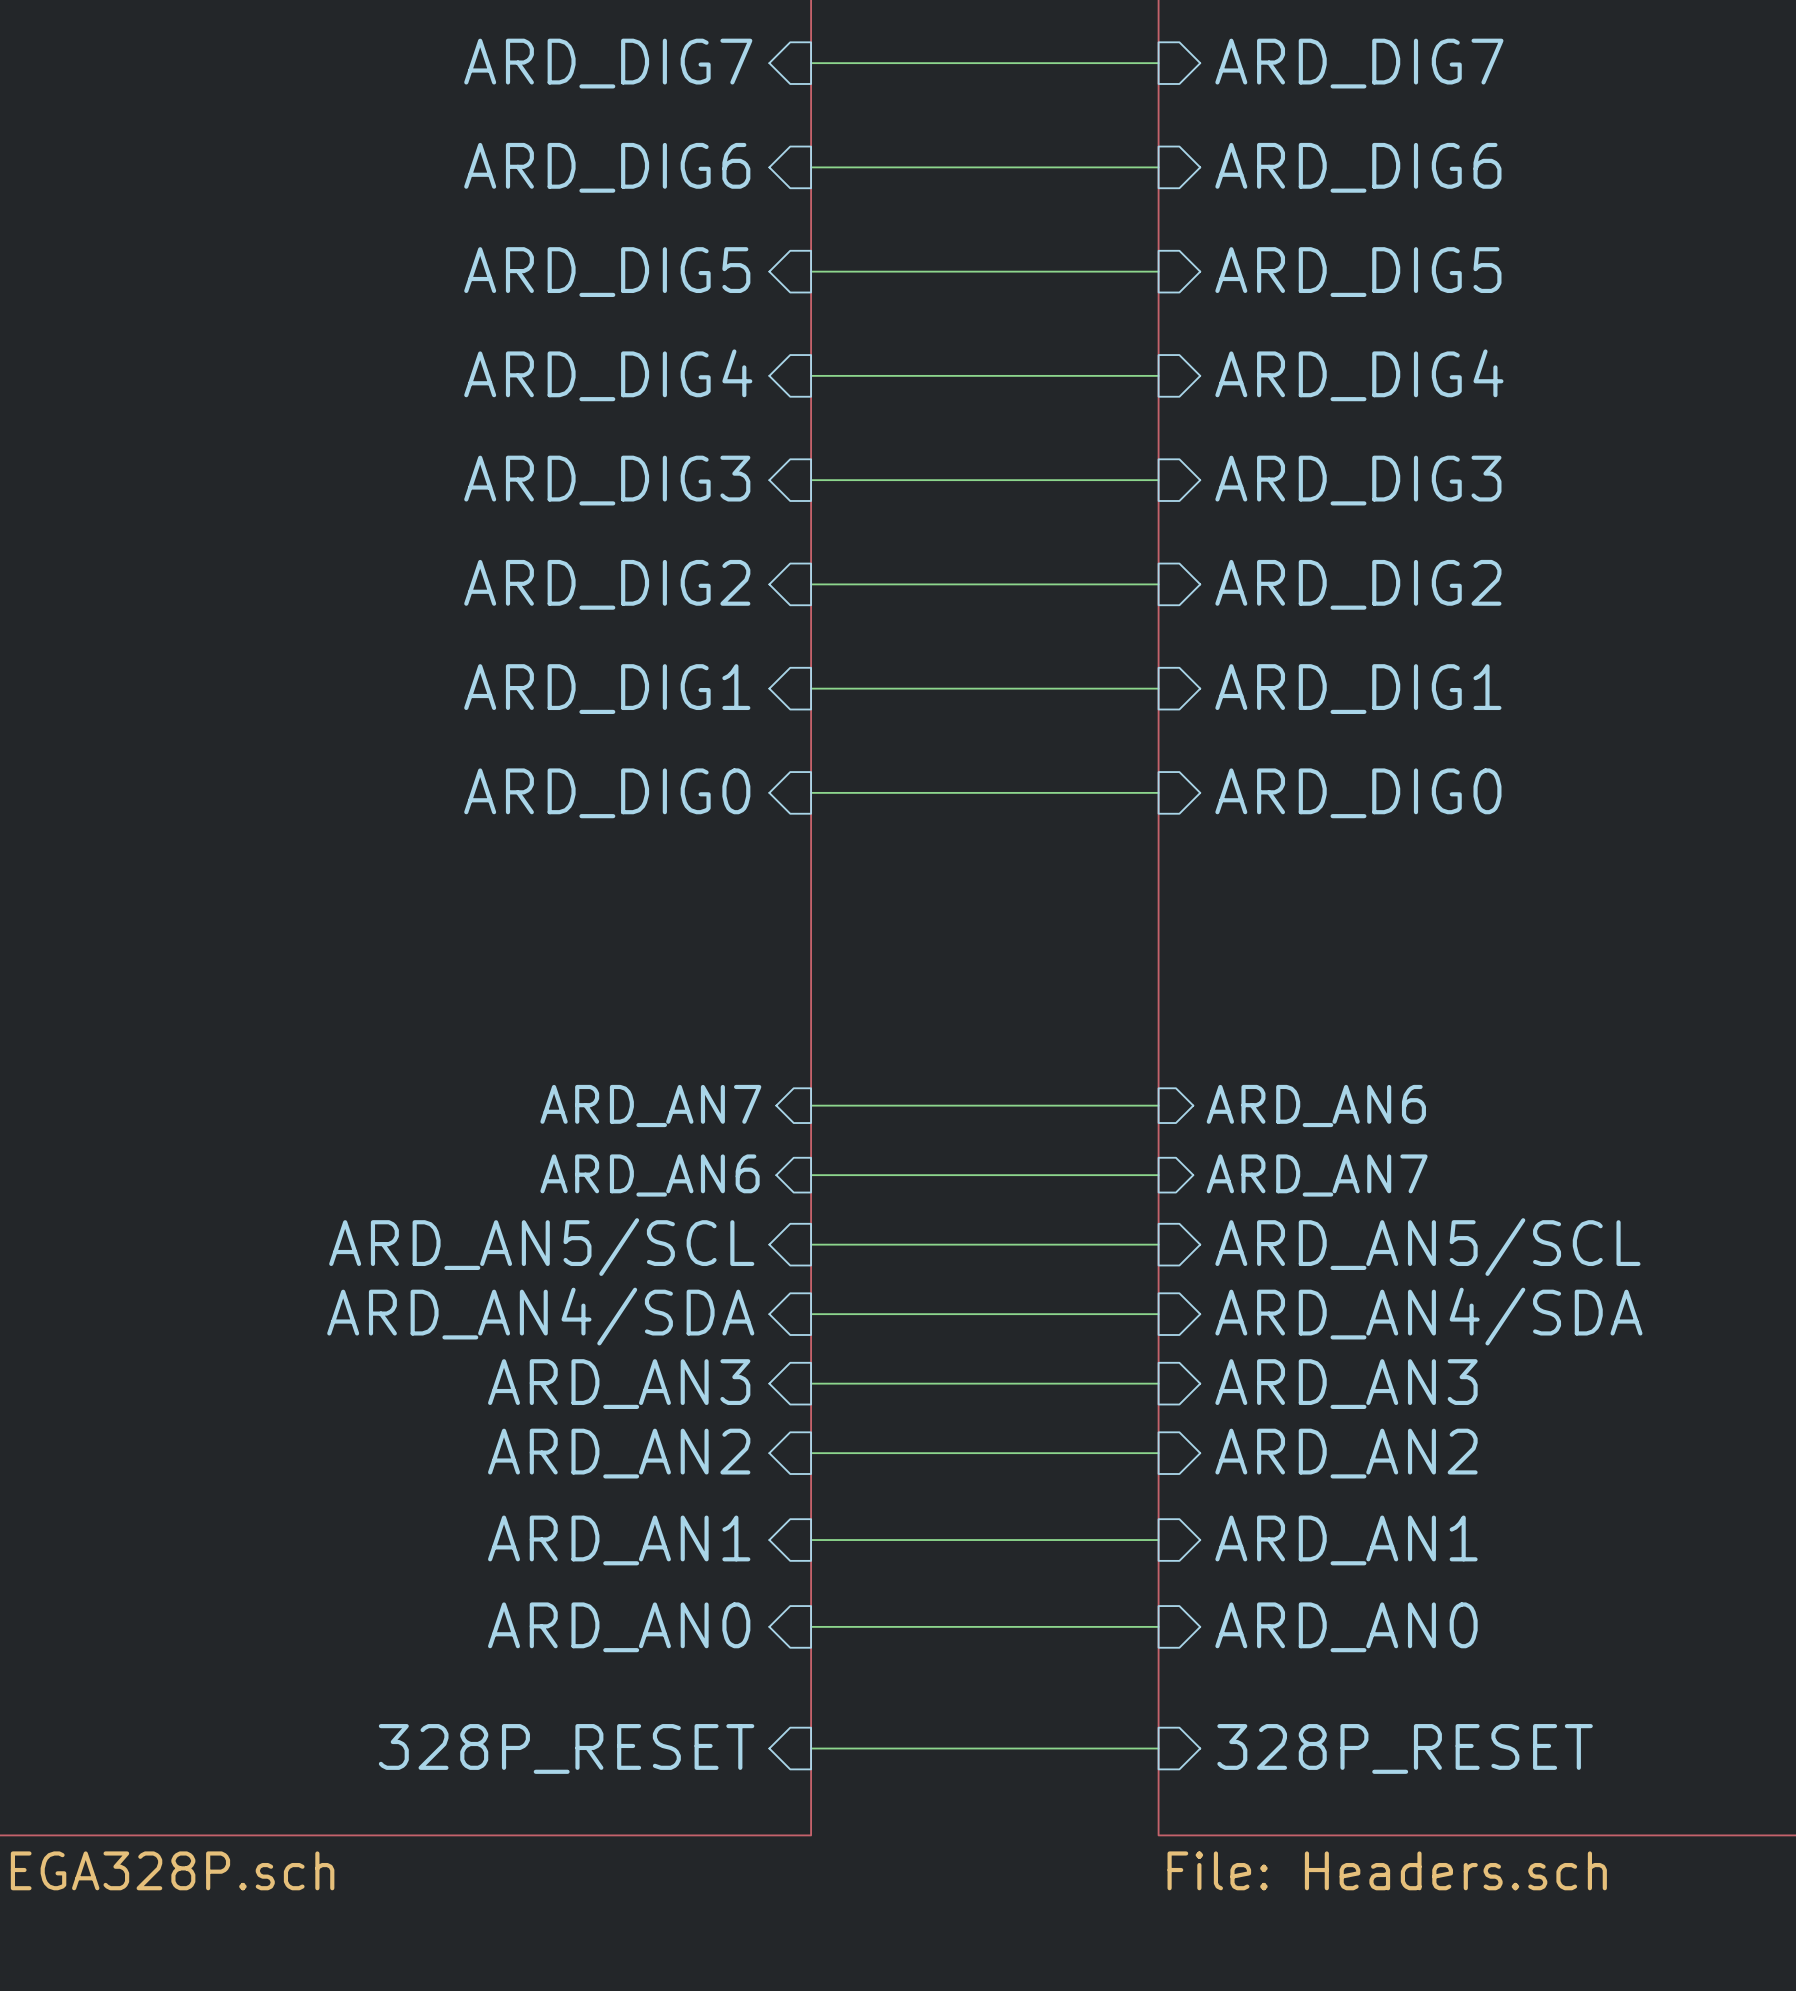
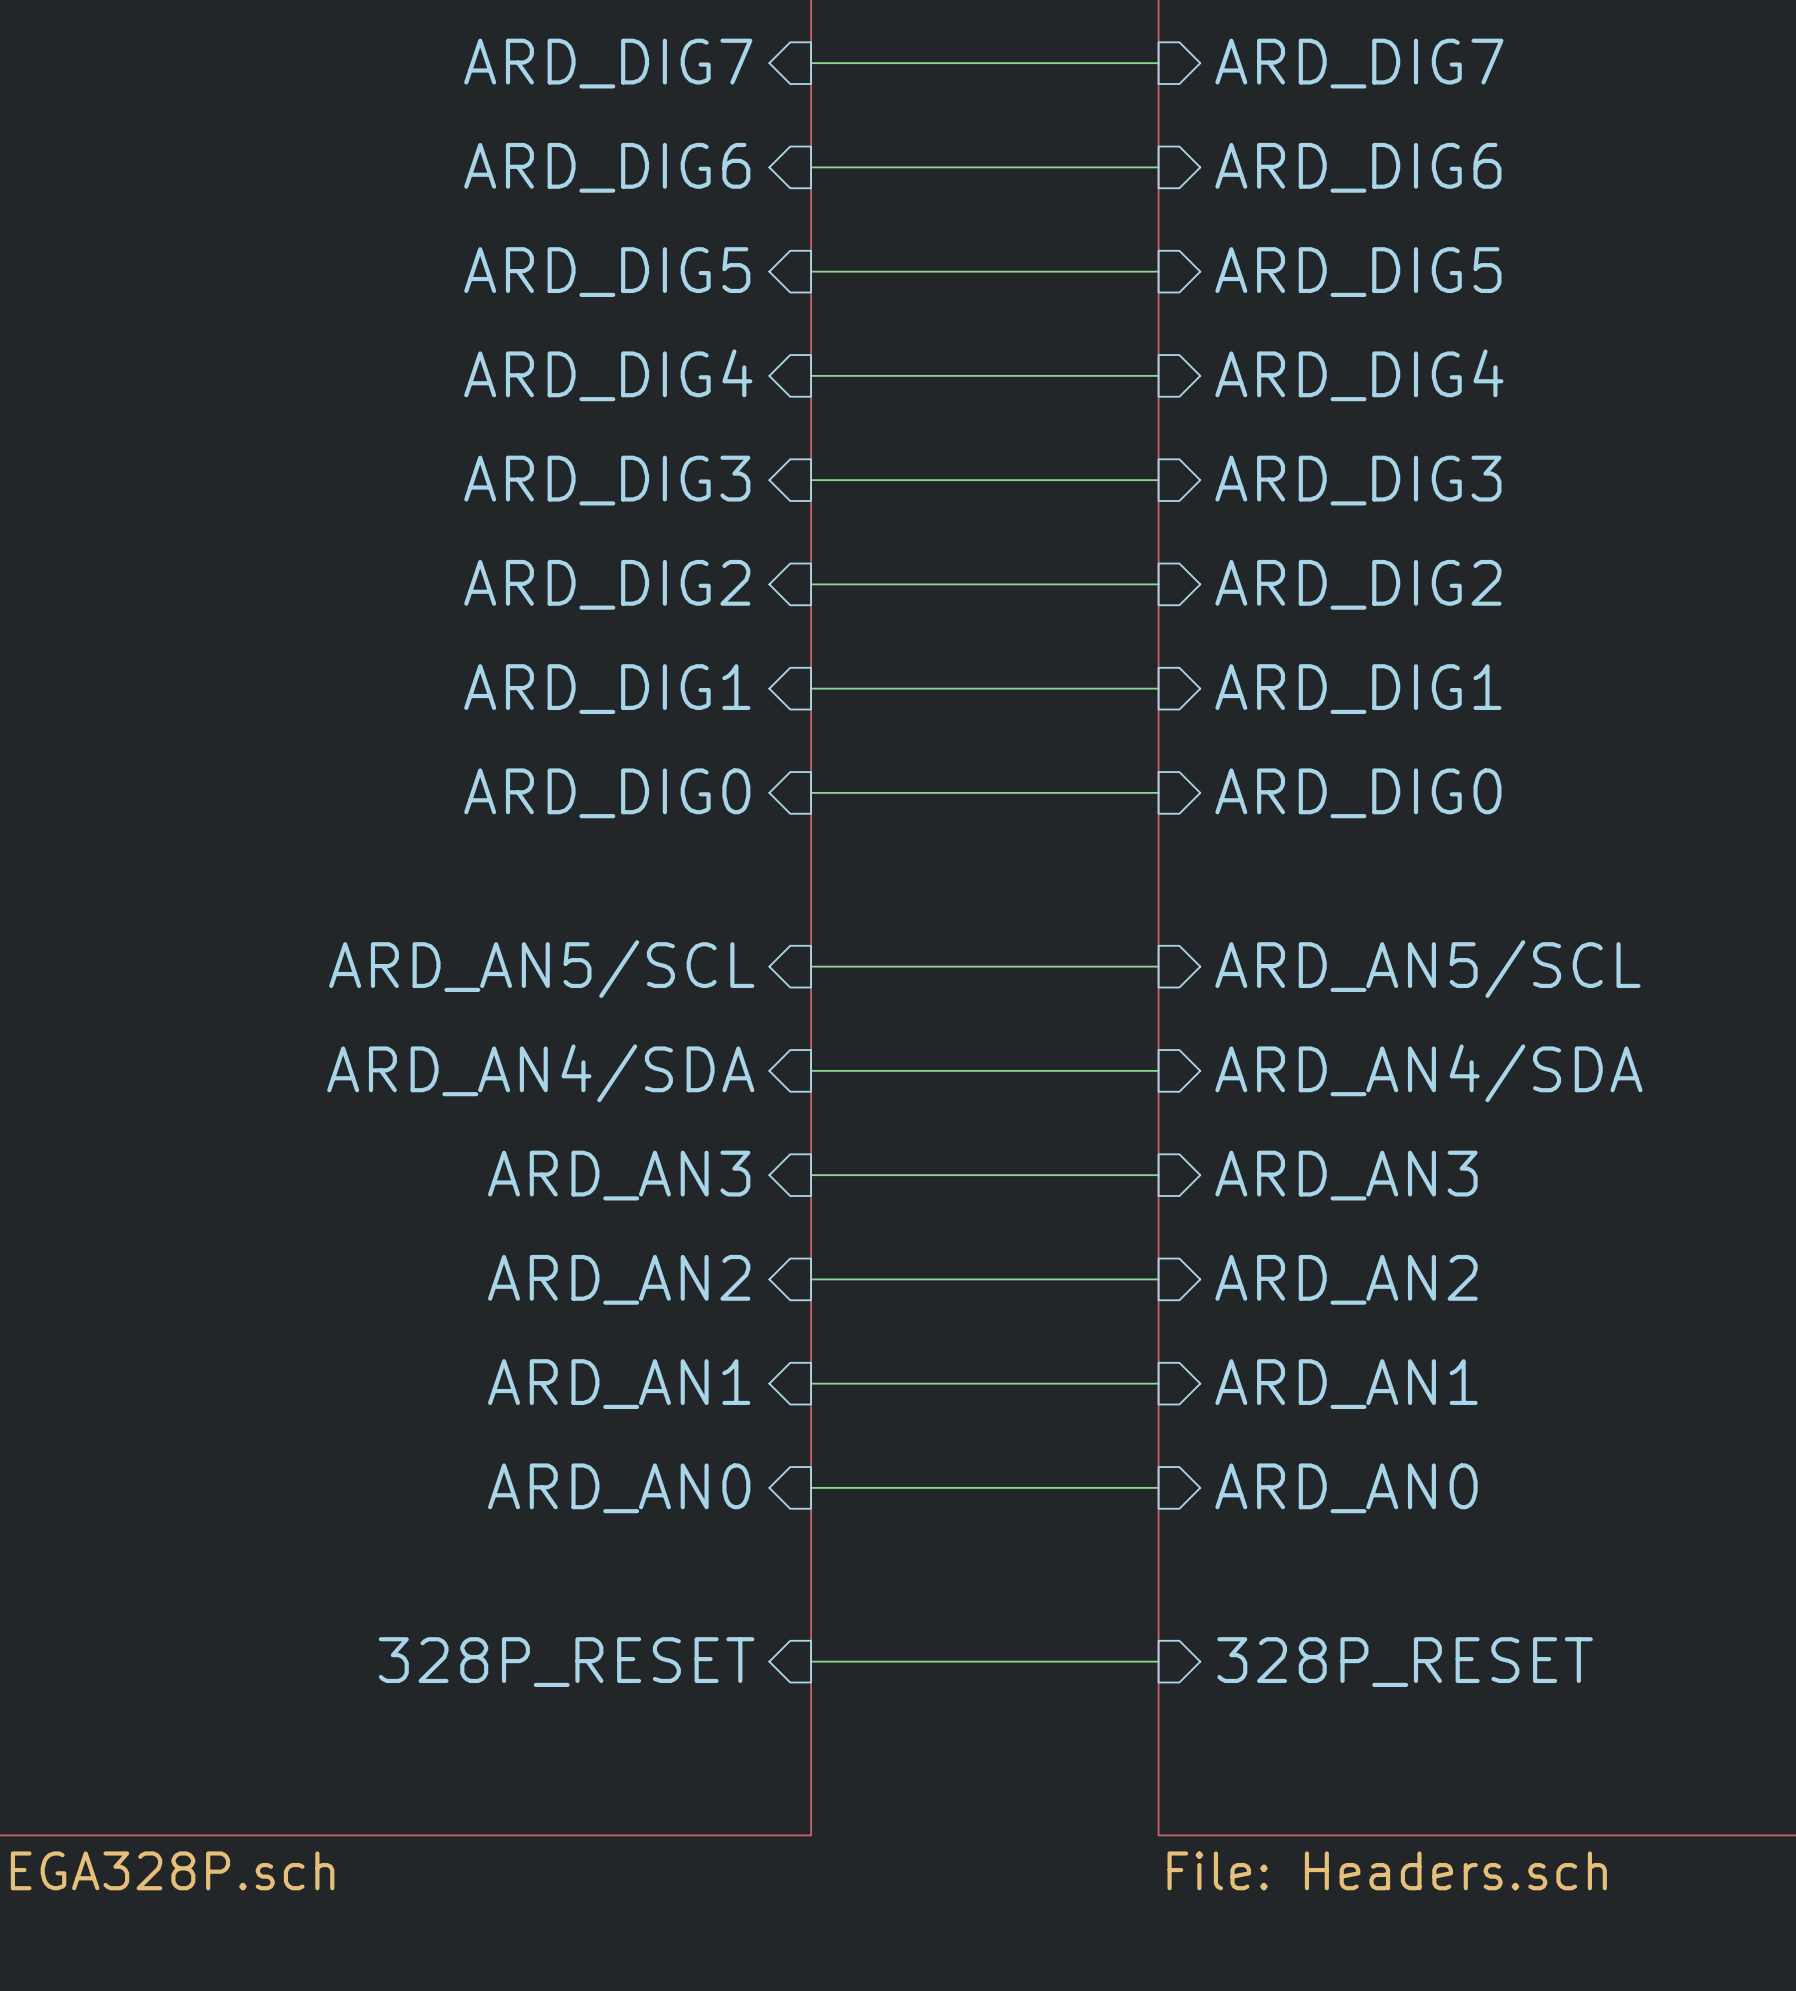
sheet pin: none -> ARD_AN5/SCL (541, 969)
sheet pin: none -> ARD_AN5/SCL (1427, 969)
wire: (811, 1105) (1158, 1105) -> (811, 1070) (1158, 1070)
sheet pin: ARD_AN7 (650, 1106) -> none
sheet pin: ARD_AN6 (1316, 1106) -> none
sheet pin: ARD_AN6 (650, 1175) -> ARD_AN3 (619, 1175)
sheet pin: ARD_AN7 (1317, 1175) -> ARD_AN3 (1346, 1175)
wire: (811, 1244) (1158, 1244) -> (811, 1279) (1158, 1279)
sheet pin: ARD_AN5/SCL (541, 1247) -> none
sheet pin: ARD_AN5/SCL (1427, 1247) -> none
wire: (811, 1314) (1158, 1314) -> (811, 966) (1158, 966)
sheet pin position: ARD_AN4/SDA (540, 1316) -> ARD_AN4/SDA (540, 1073)
sheet pin position: ARD_AN4/SDA (1428, 1316) -> ARD_AN4/SDA (1428, 1073)
sheet pin: ARD_AN3 (619, 1384) -> ARD_AN1 (619, 1384)
sheet pin: ARD_AN3 (1346, 1384) -> ARD_AN1 (1346, 1384)
sheet pin position: ARD_AN2 (619, 1453) -> ARD_AN2 (619, 1279)
wire: (811, 1453) (1158, 1453) -> (811, 1487) (1158, 1487)
sheet pin position: ARD_AN2 (1346, 1453) -> ARD_AN2 (1346, 1279)
sheet pin: ARD_AN1 (619, 1540) -> none
wire: (811, 1540) (1158, 1540) -> none
sheet pin: ARD_AN1 (1346, 1540) -> none
wire: (811, 1626) (1158, 1626) -> (811, 1661) (1158, 1661)
sheet pin position: ARD_AN0 (619, 1627) -> ARD_AN0 (619, 1488)
sheet pin position: ARD_AN0 (1346, 1627) -> ARD_AN0 (1346, 1488)
sheet pin position: 328P_RESET (566, 1748) -> 328P_RESET (566, 1662)
wire: (811, 1748) (1158, 1748) -> none
sheet pin position: 328P_RESET (1405, 1748) -> 328P_RESET (1405, 1662)

